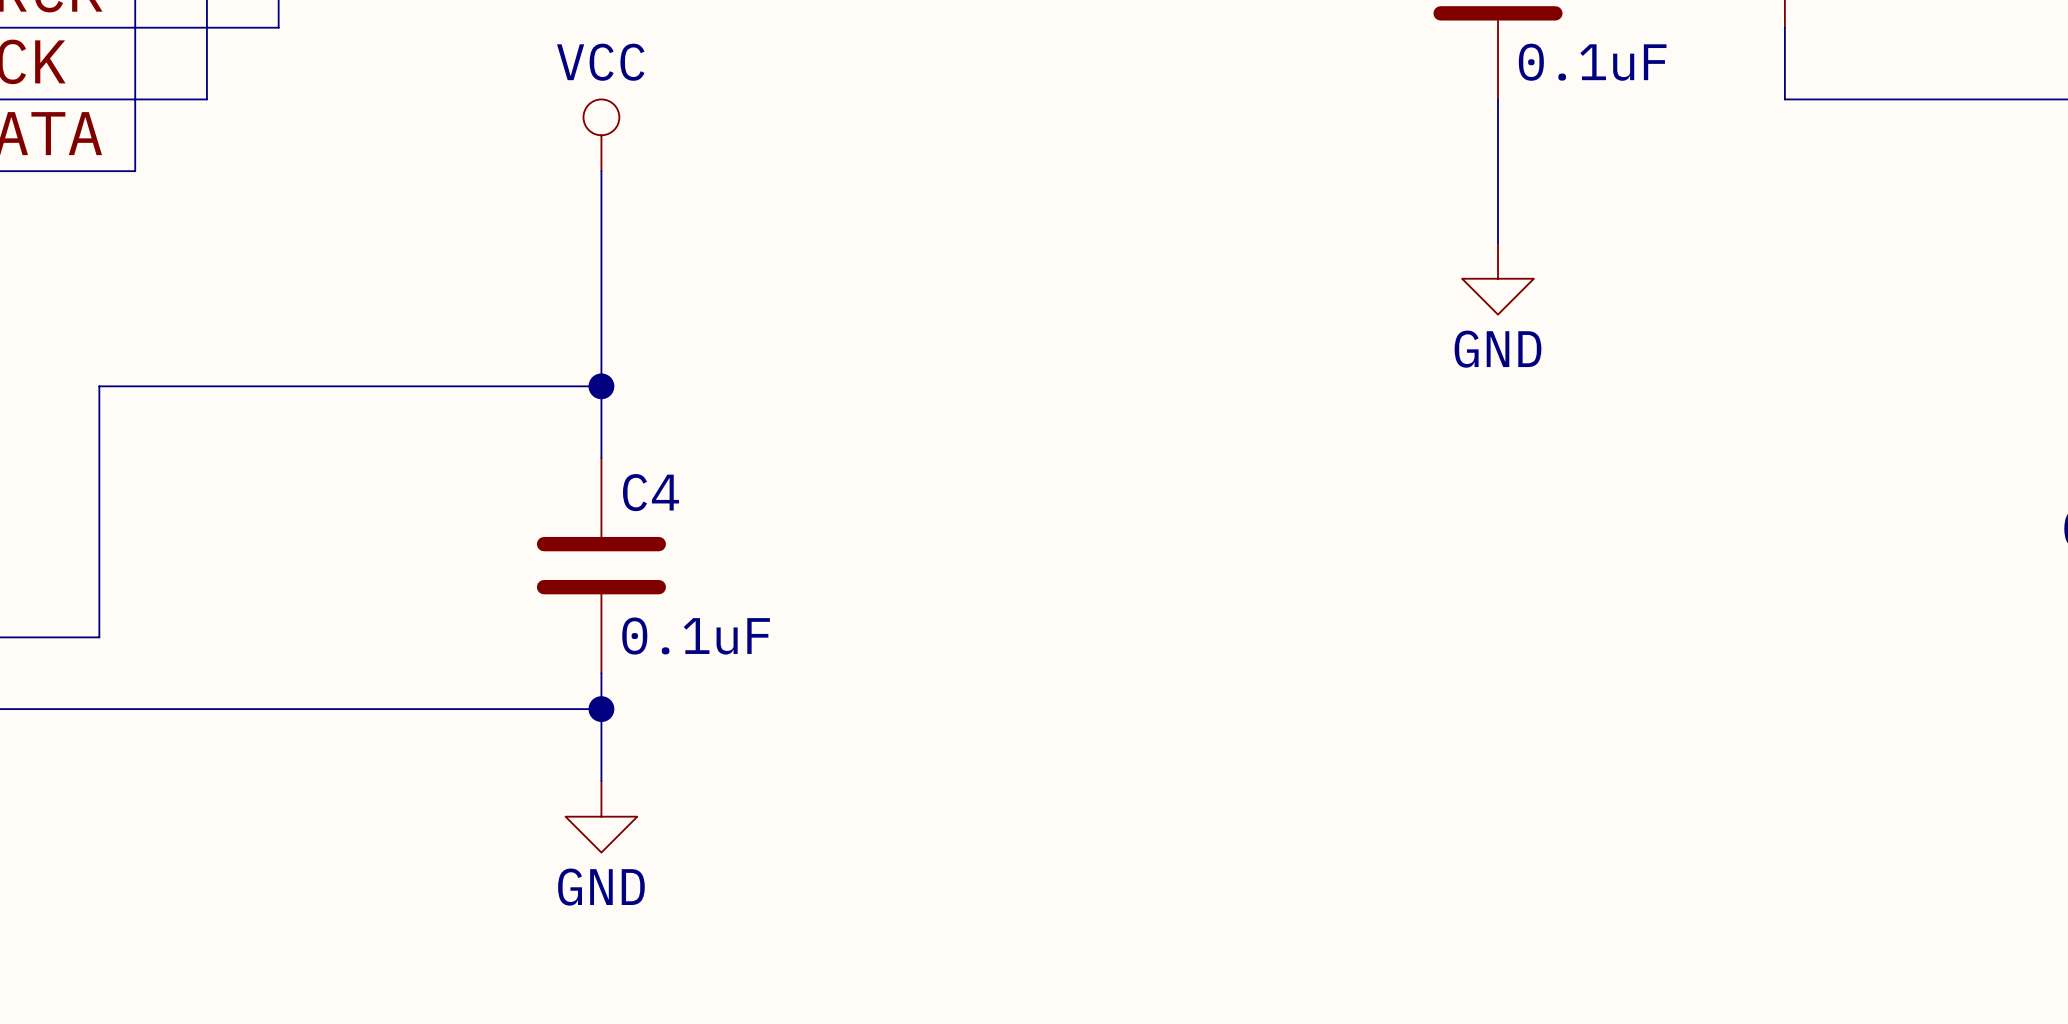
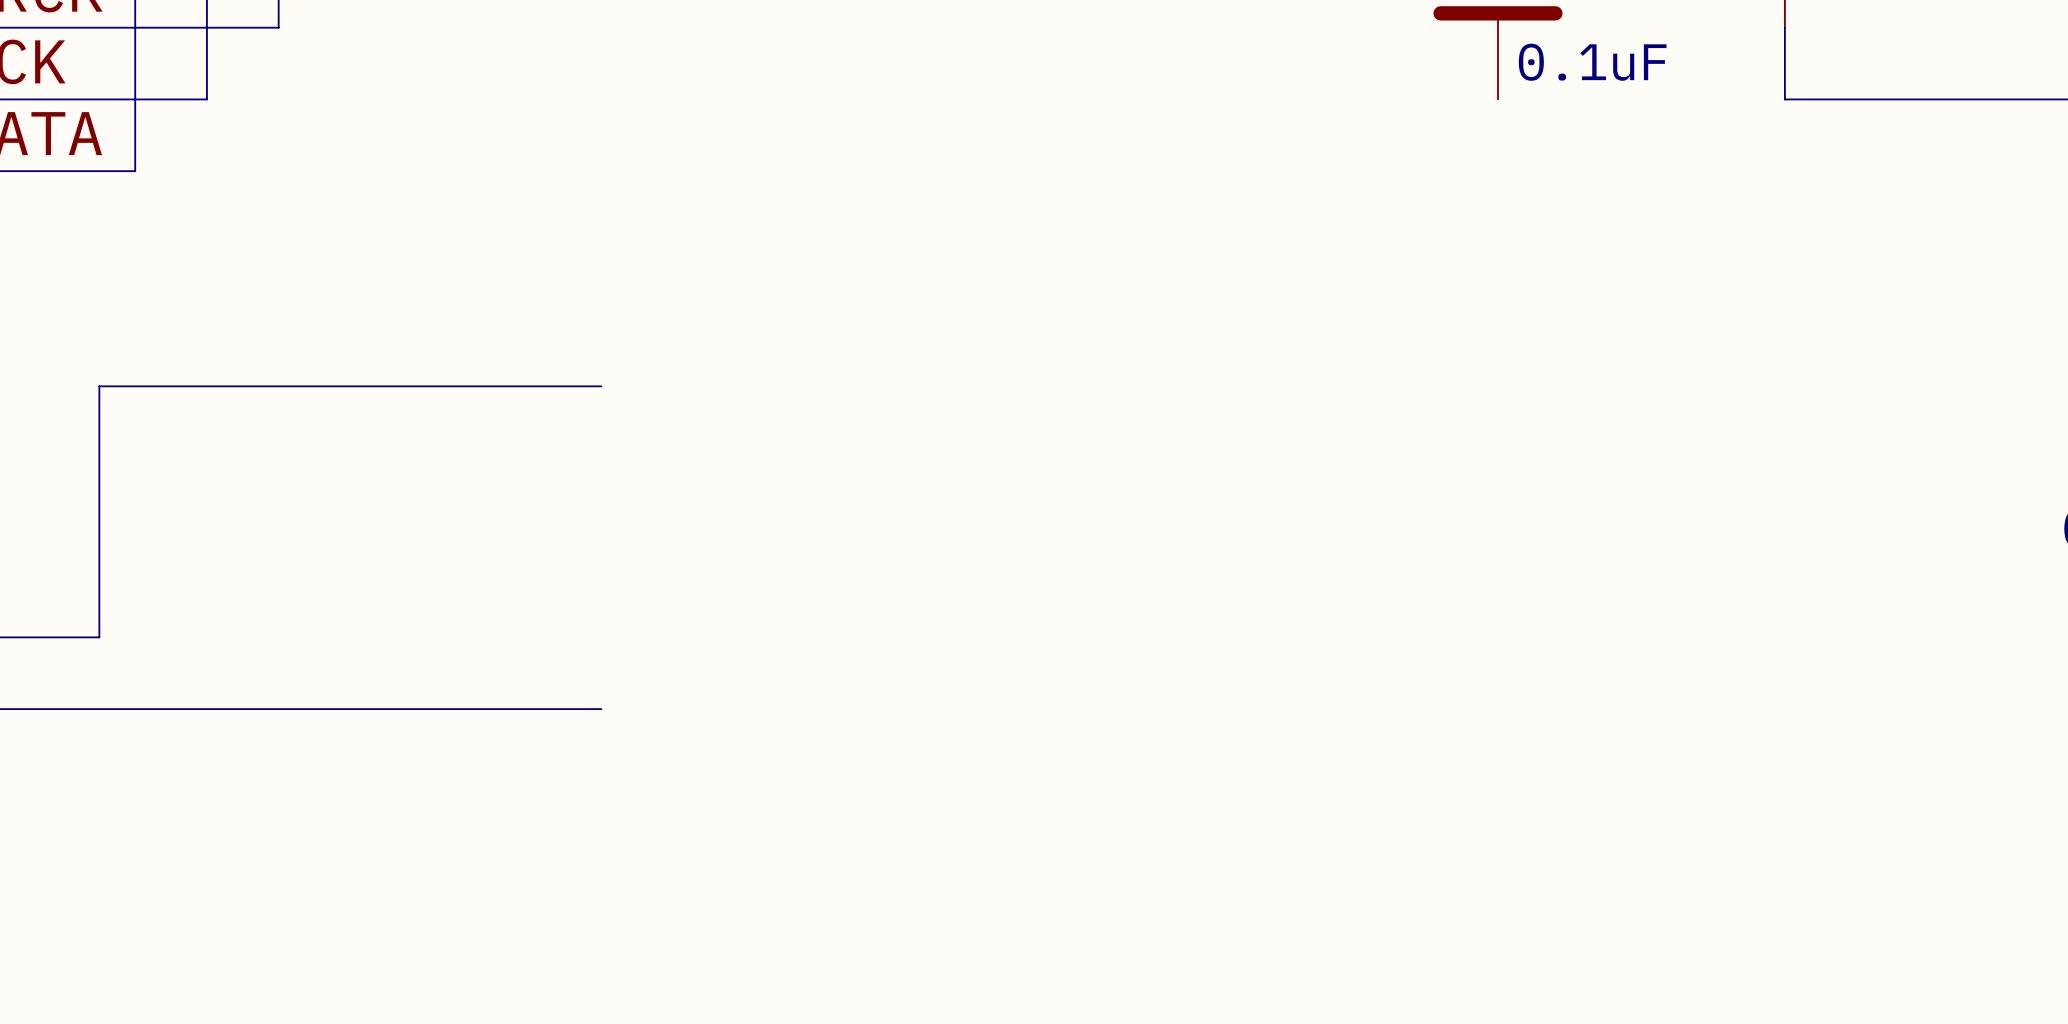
wire: (1498, 99) (1498, 242) -> none
power symbol: VCC (601, 135) -> none
wire: (601, 171) (601, 458) -> none
power symbol: GND (1498, 278) -> none
junction: (601, 386) -> none
C4: 0.1uF (601, 565) -> none
wire: (601, 673) (601, 780) -> none
junction: (601, 709) -> none
power symbol: GND (601, 816) -> none

